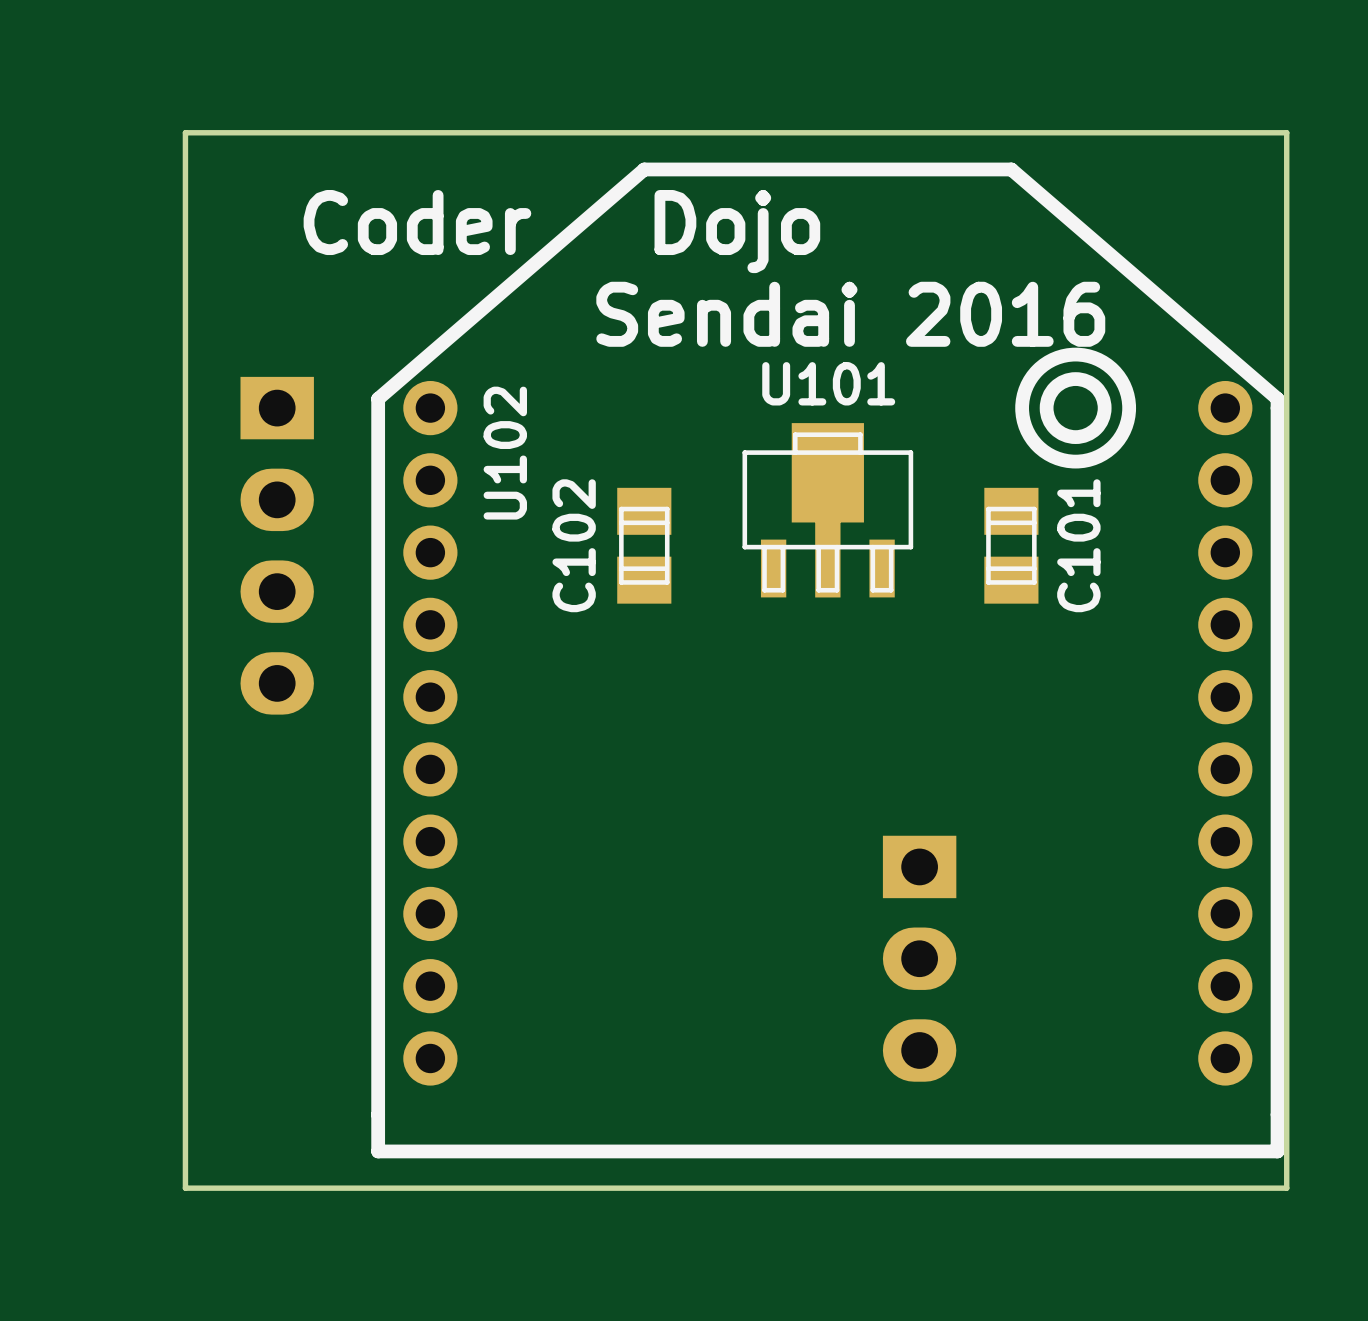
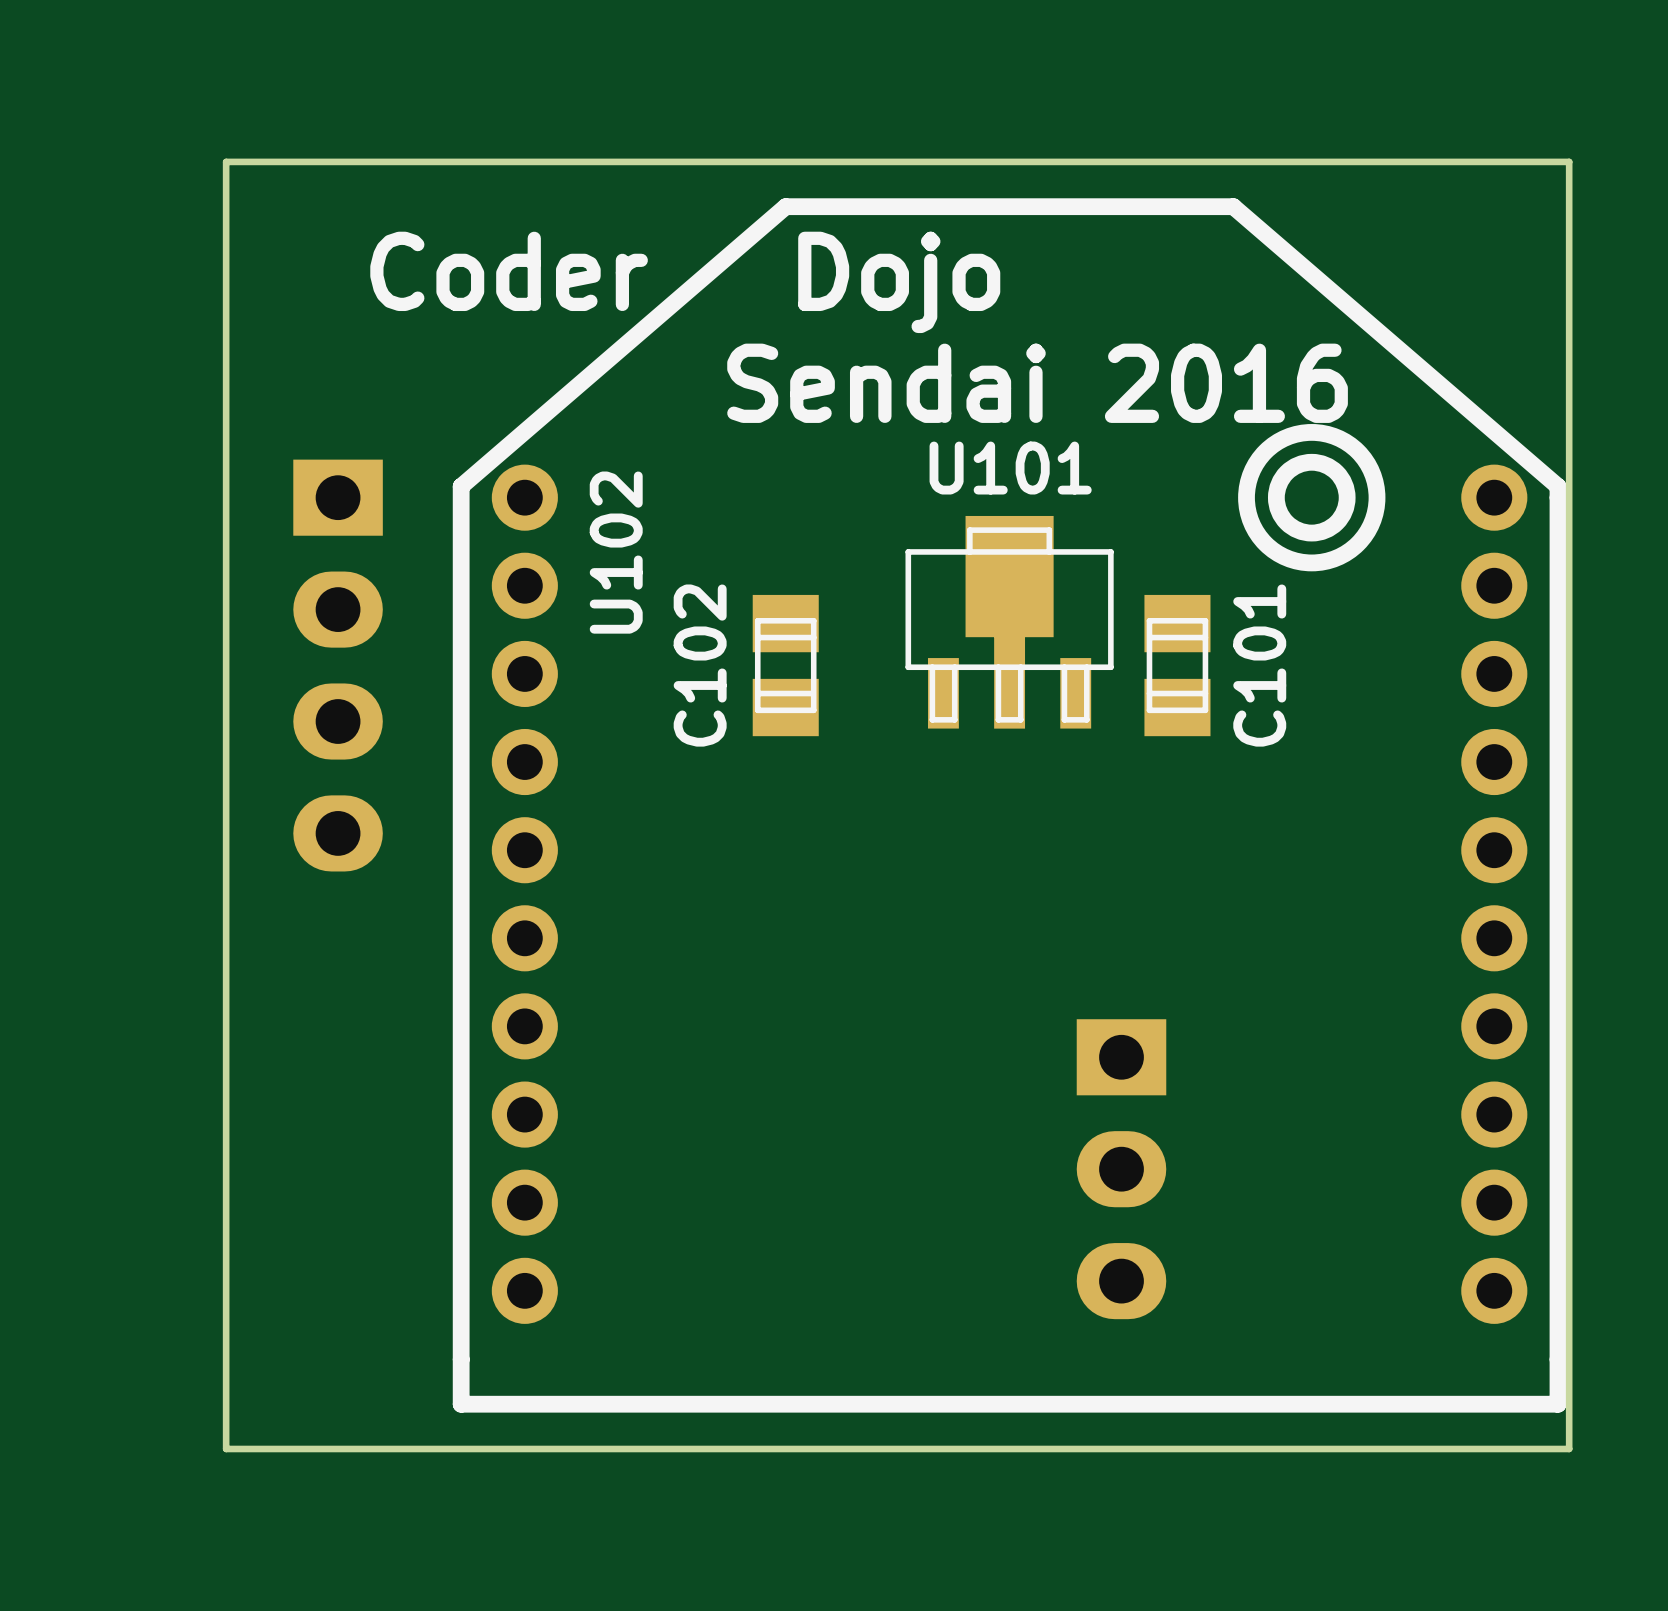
C101 position: (1011, 545) -> (1177, 665)

